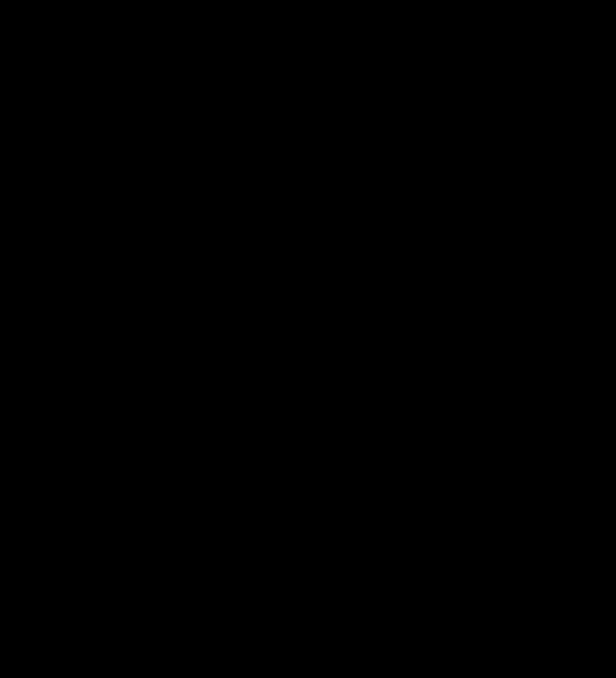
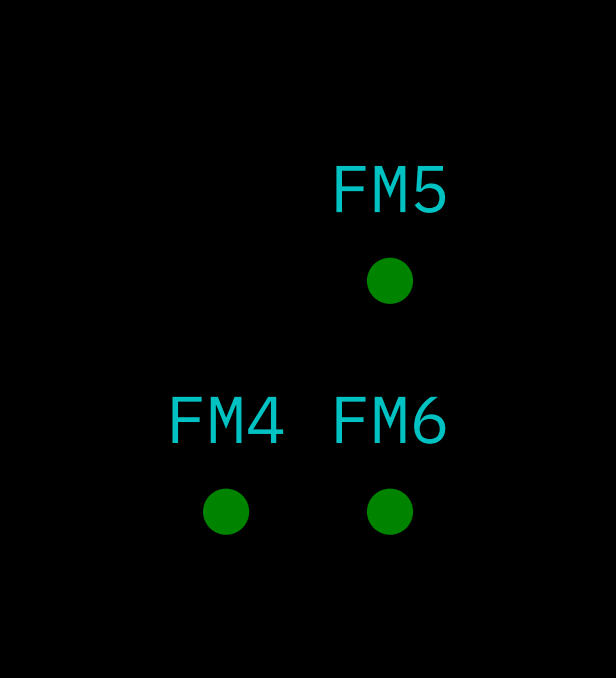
FM5: none -> (390, 280)
FM4: none -> (226, 511)
FM6: none -> (390, 511)

